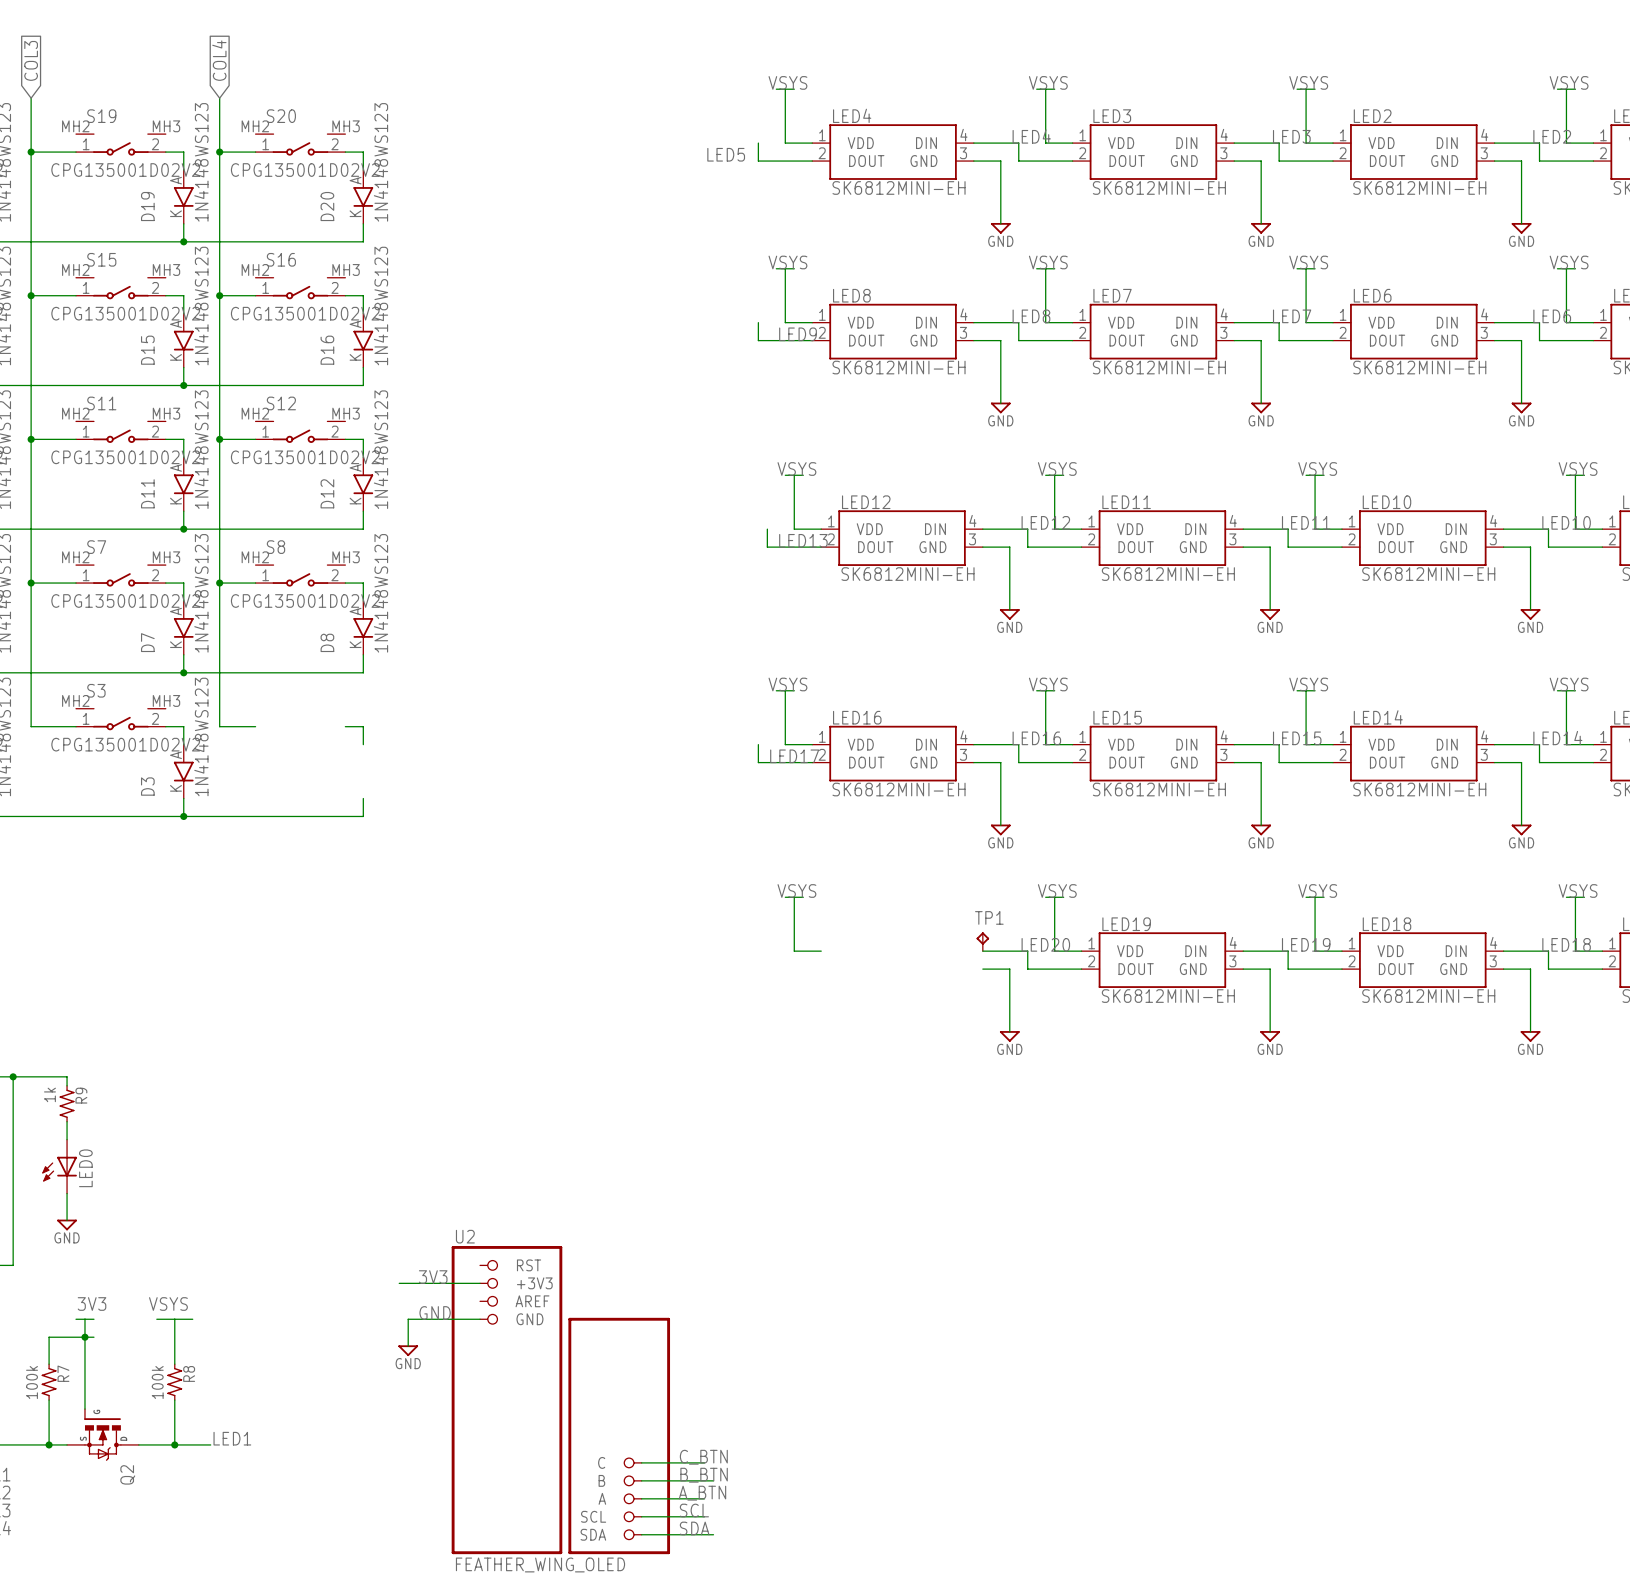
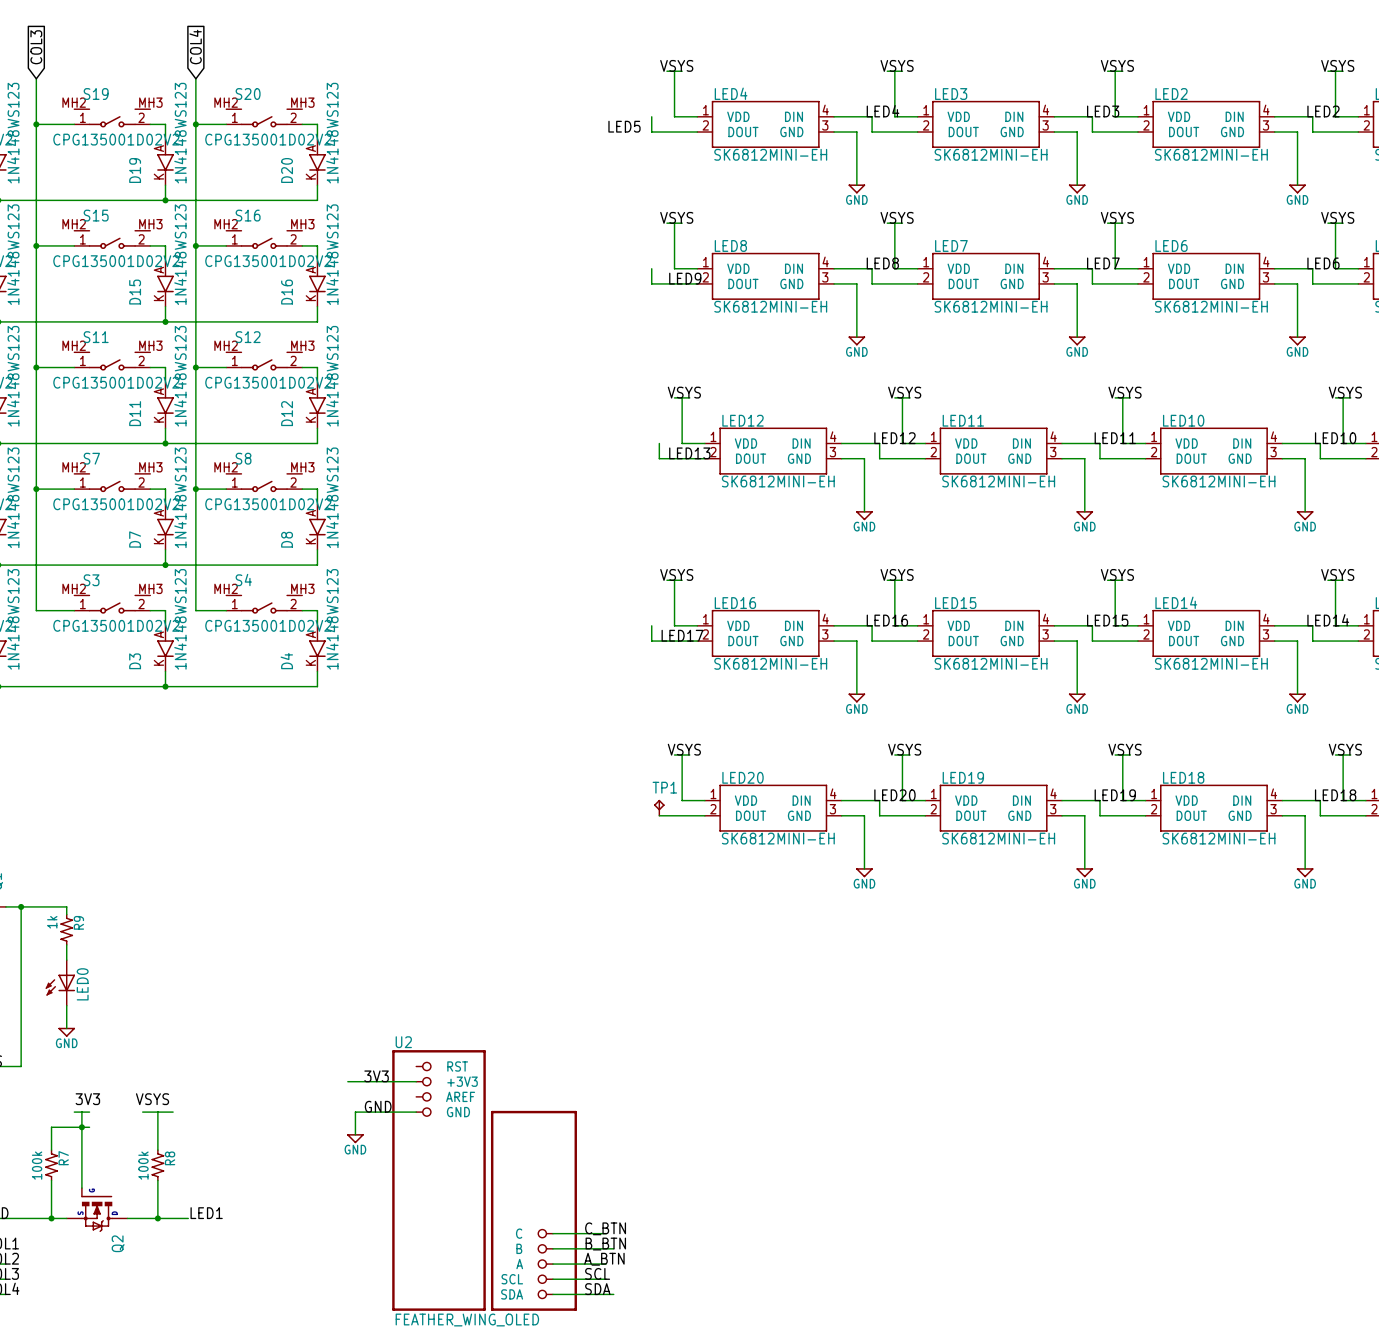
S4: none -> CPG135001D02V2 (264, 604)
D4: none -> 1N4148WS123 (317, 648)
TP1 position: (982, 941) -> (659, 807)
LED20: none -> SK6812MINI-EH (773, 808)
wire: none -> (659, 815) (704, 815)

